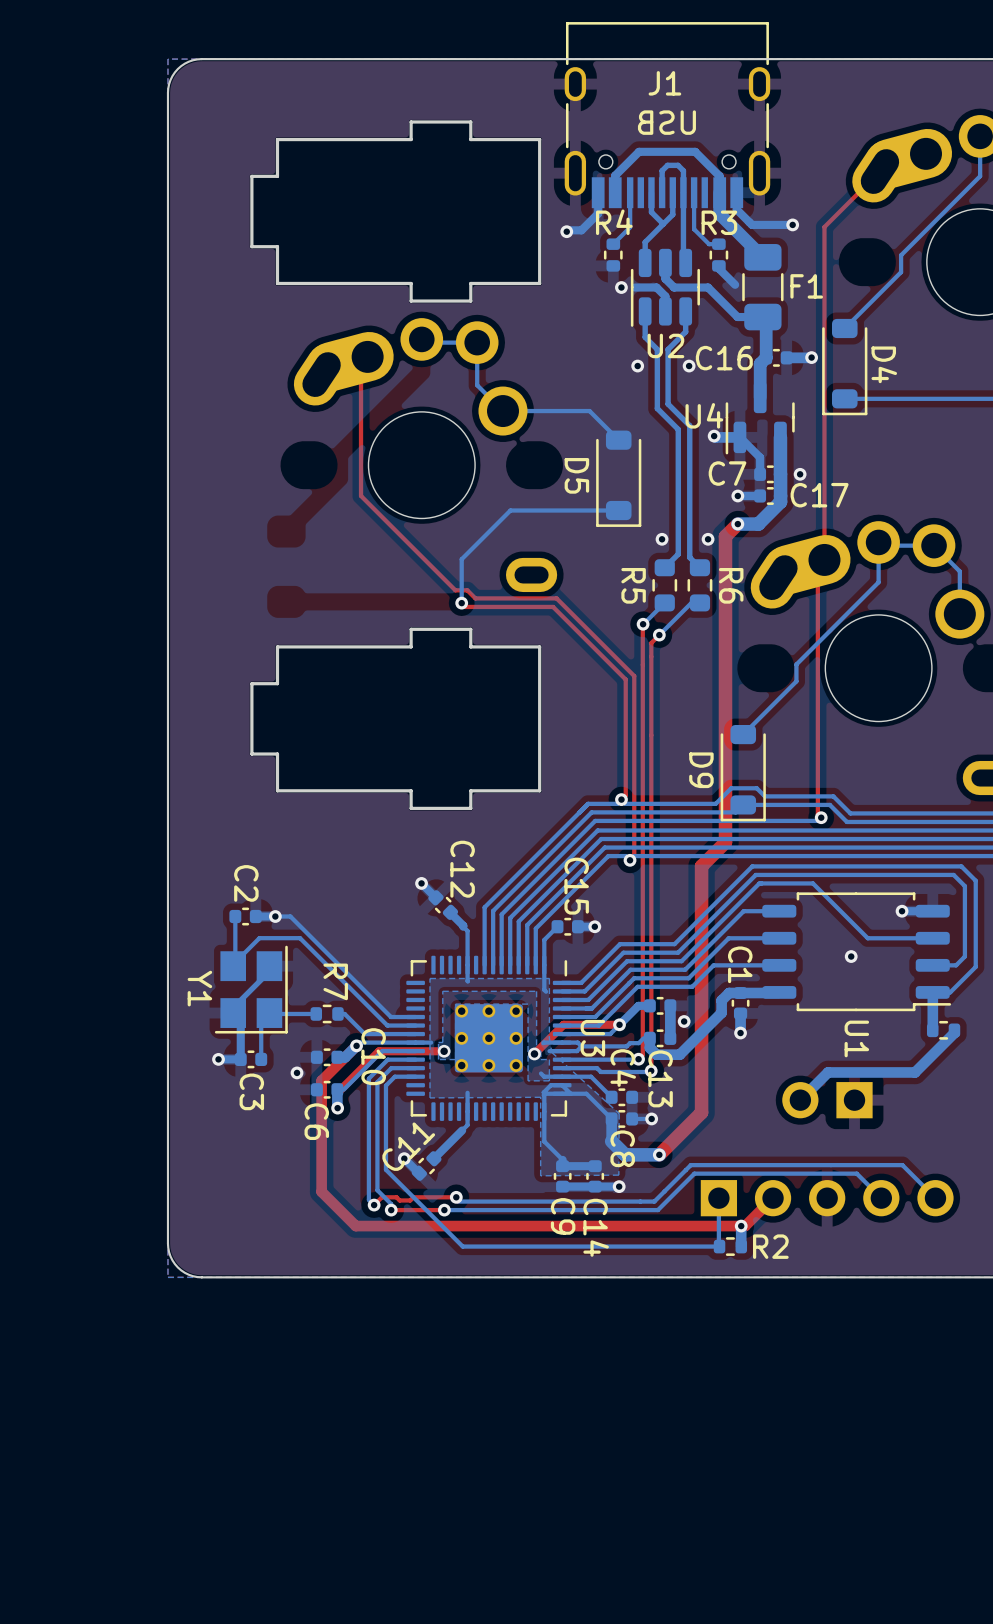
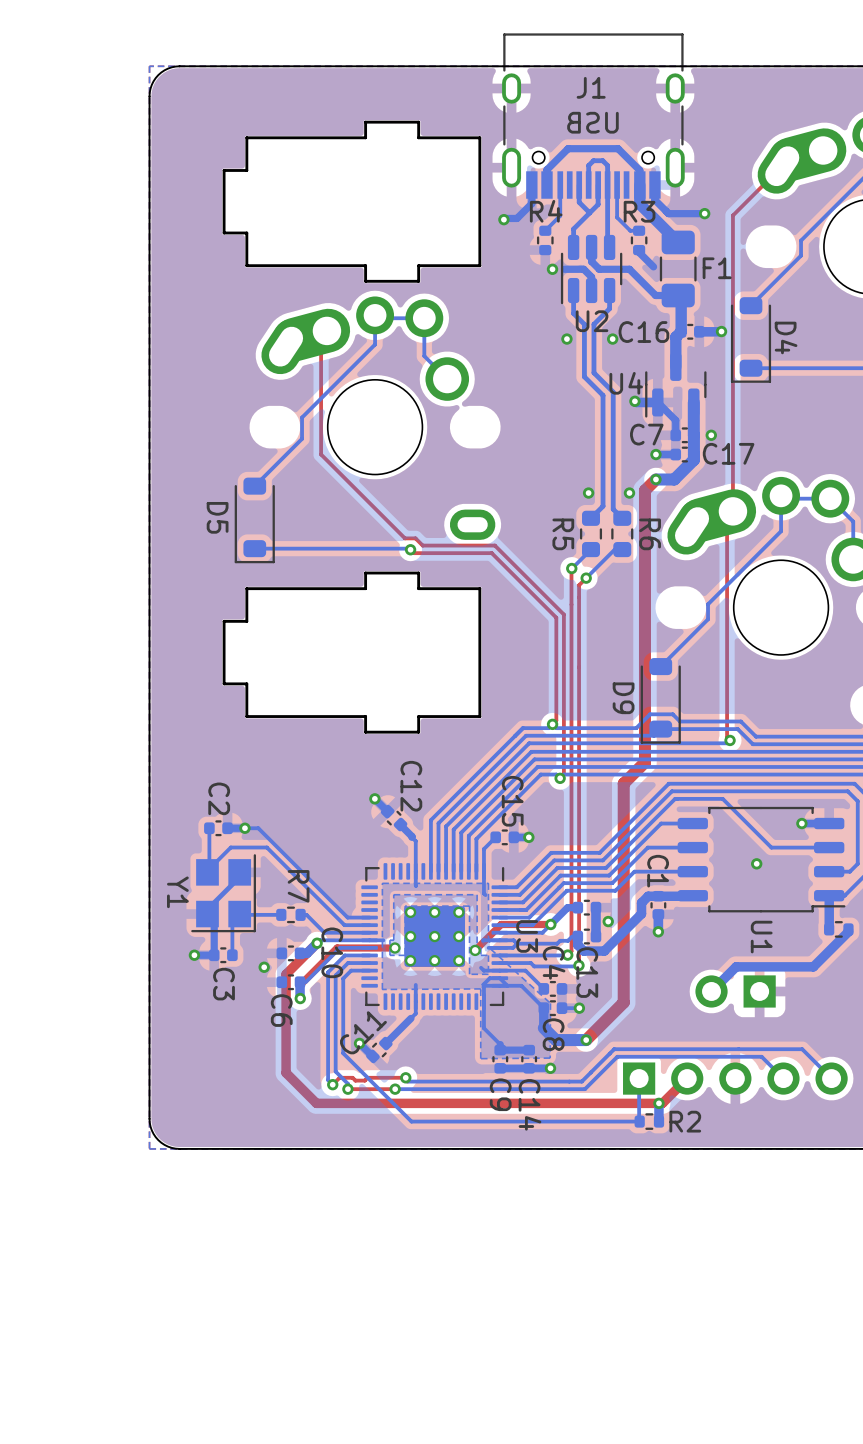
bottom track: none -> (375, 315) (375, 344) (302, 417) (302, 438) (254, 486)
bottom track: (502, 411) (589, 411) (618, 440) -> none
D5 position: (618, 478) -> (254, 520)
bottom track: (618, 510) (510, 510) (461, 559) (461, 603) -> (254, 548) (410, 549)

